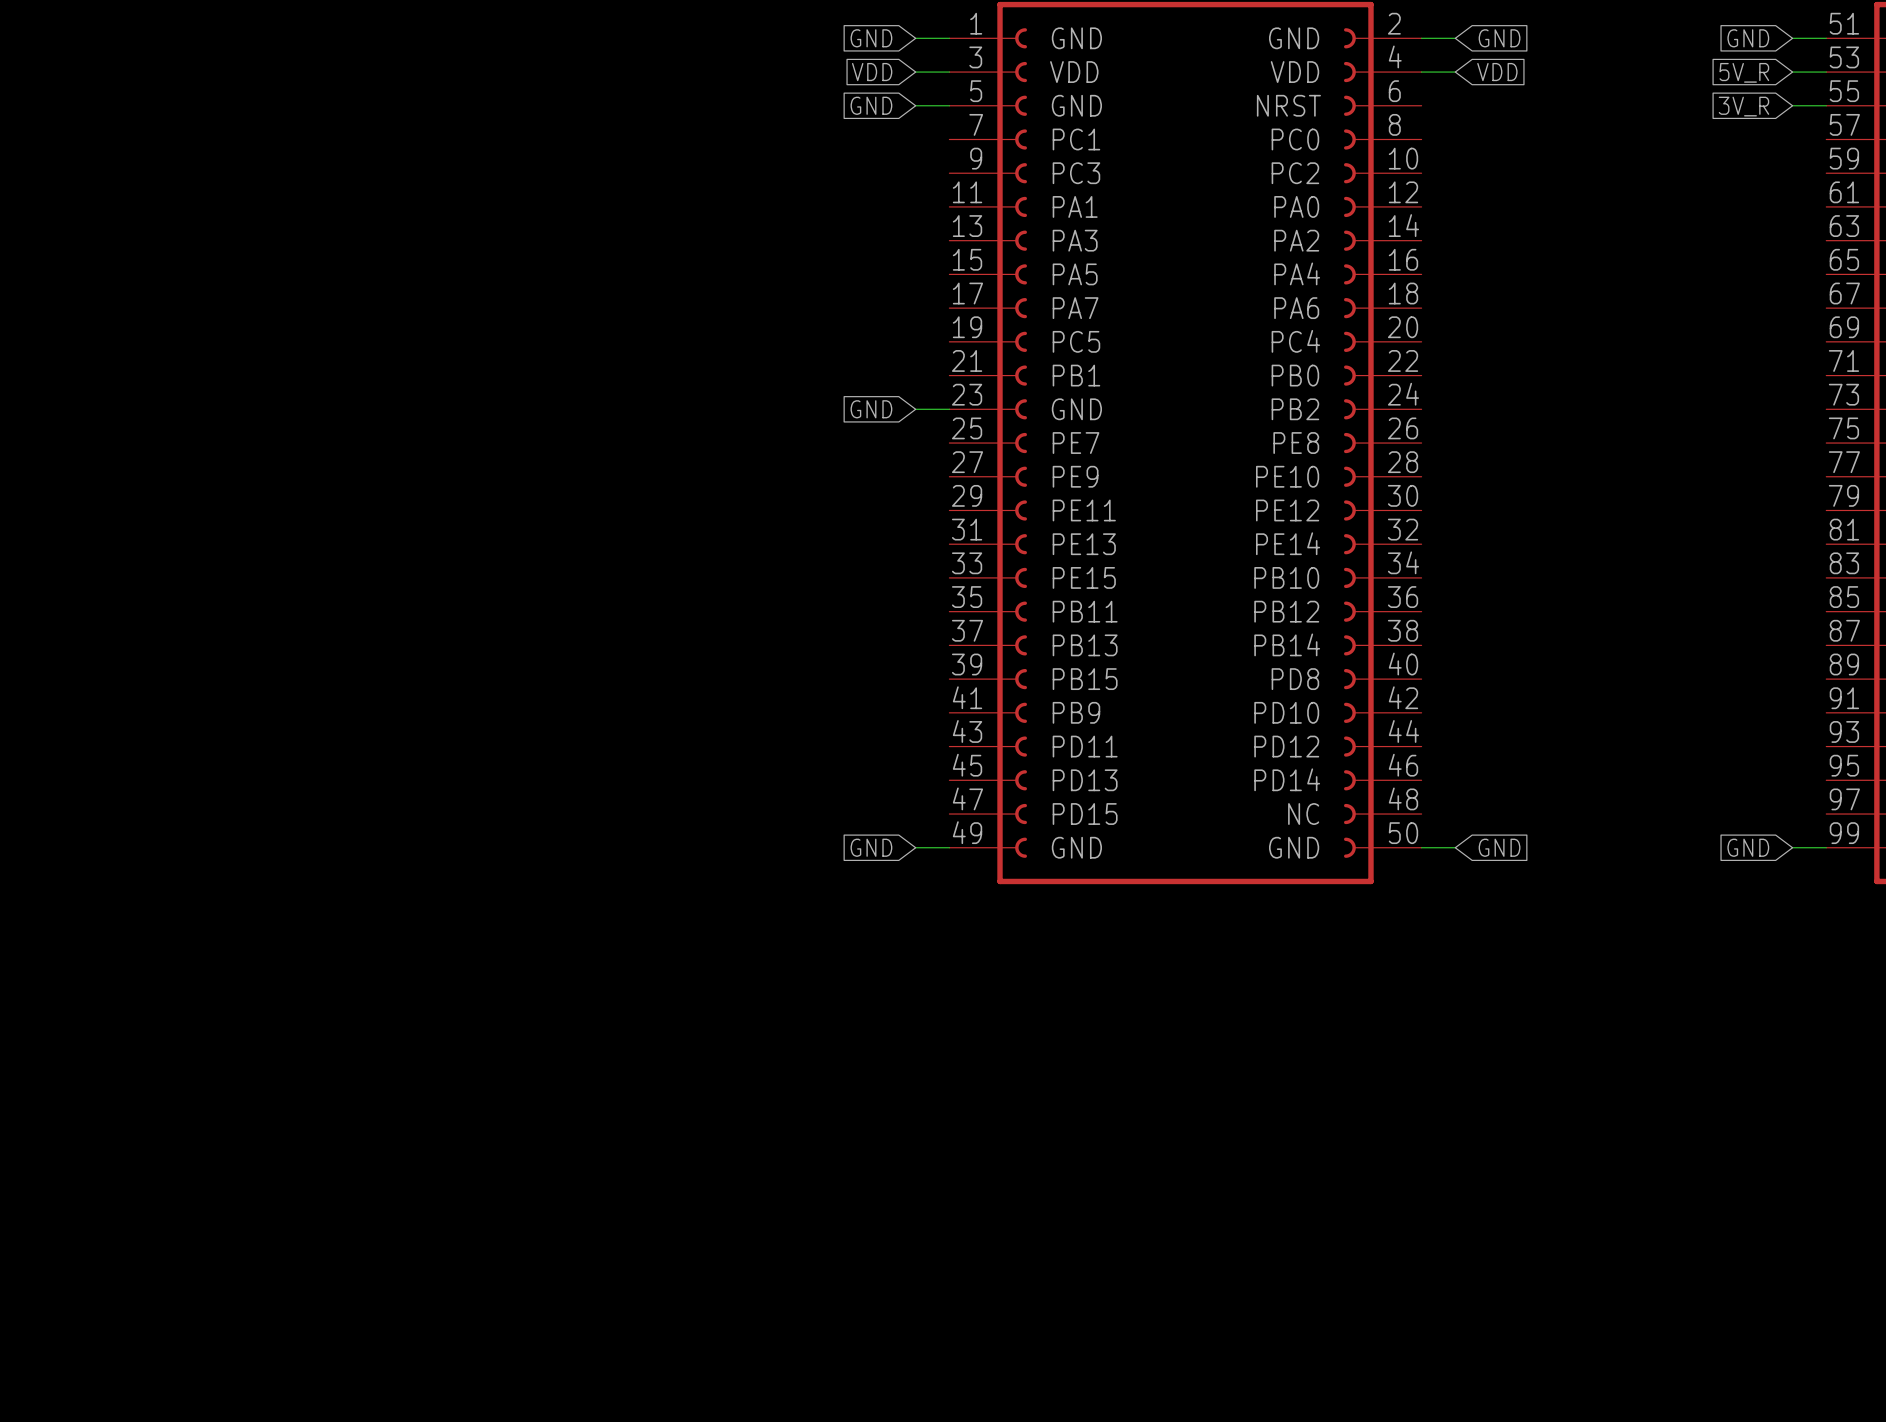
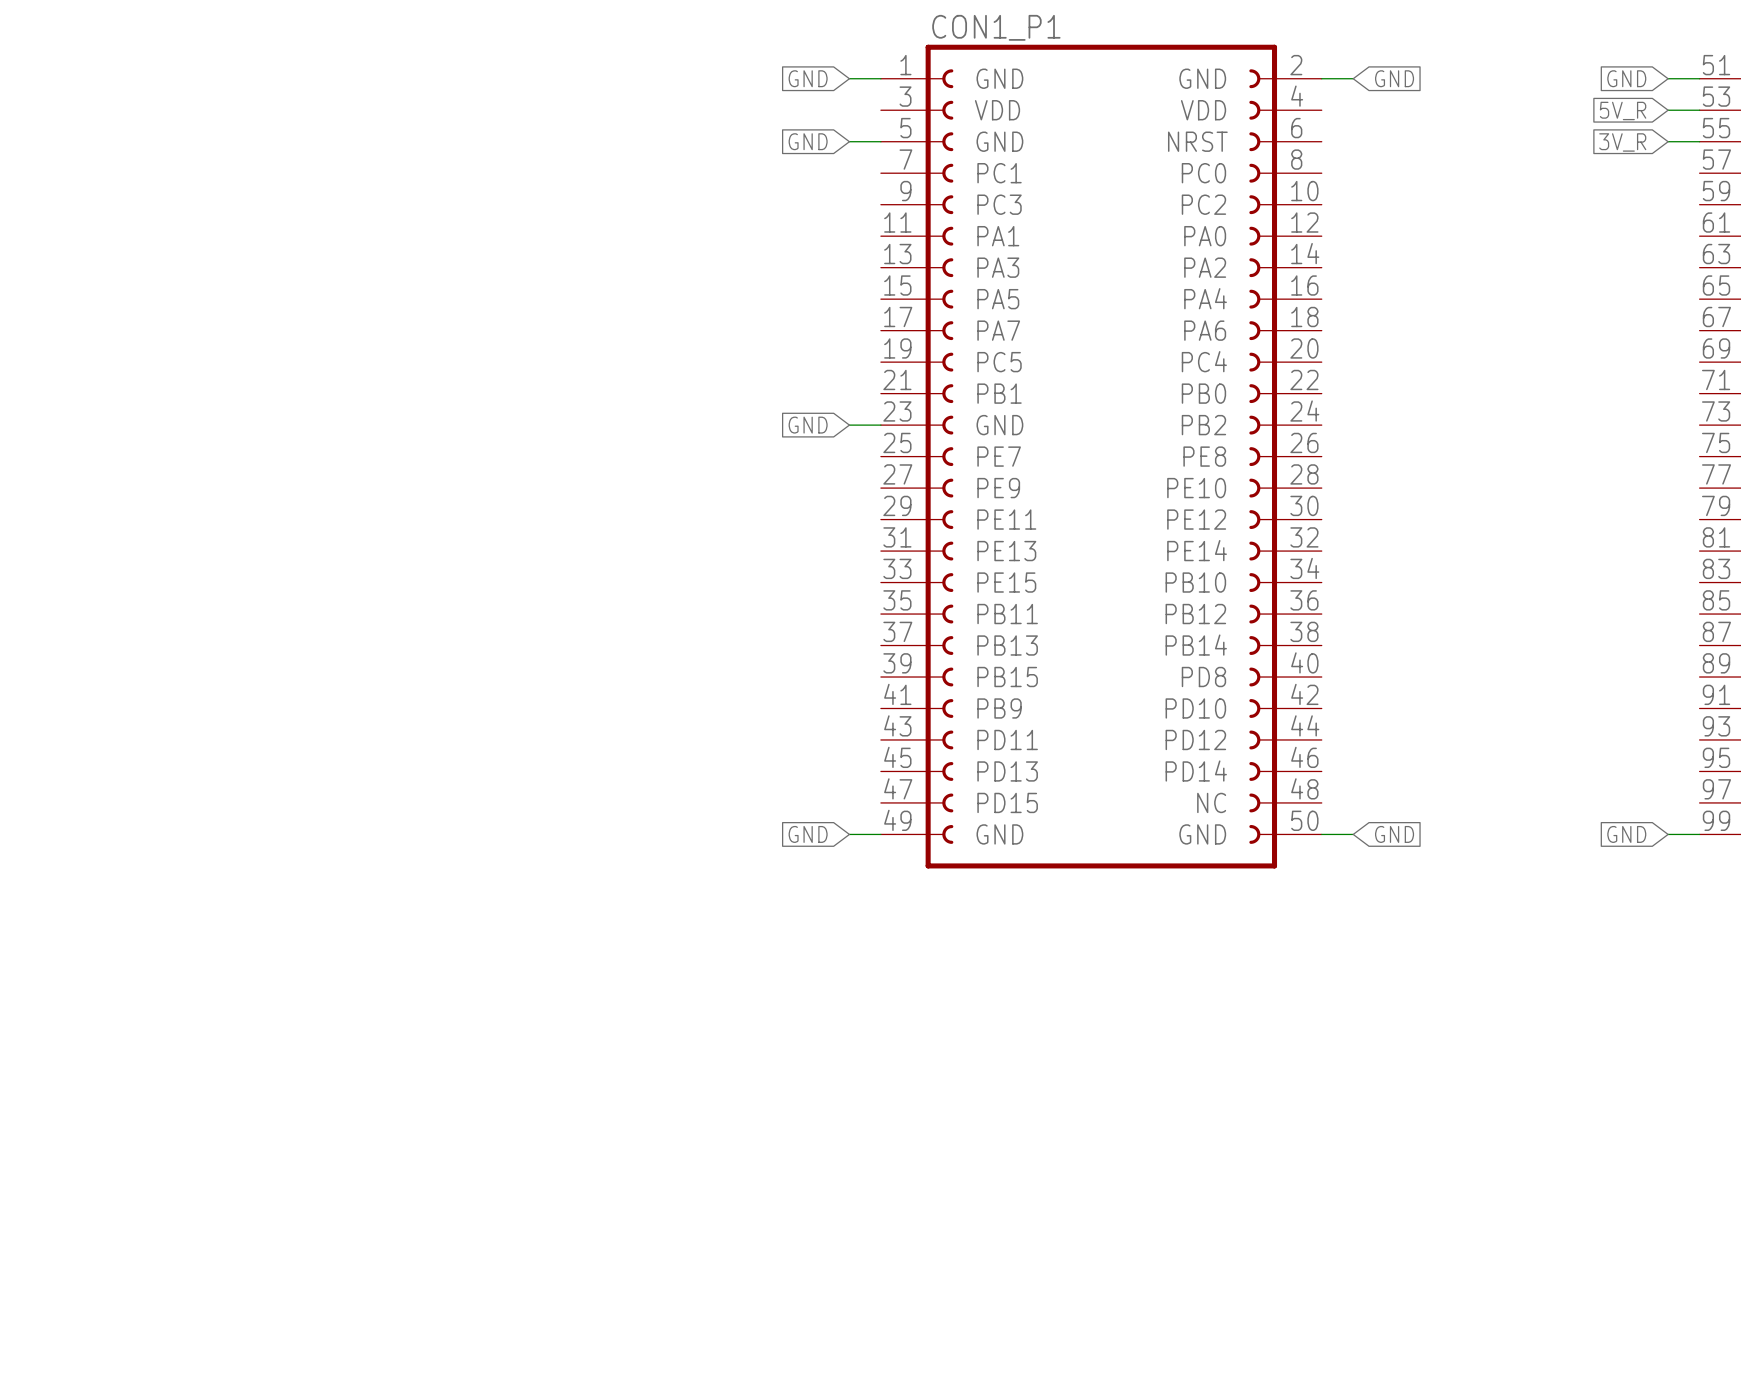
global label: VDD (872, 72) -> none
wire: (915, 72) (949, 72) -> none
wire: (1421, 72) (1455, 72) -> none
global label: VDD (1497, 72) -> none

